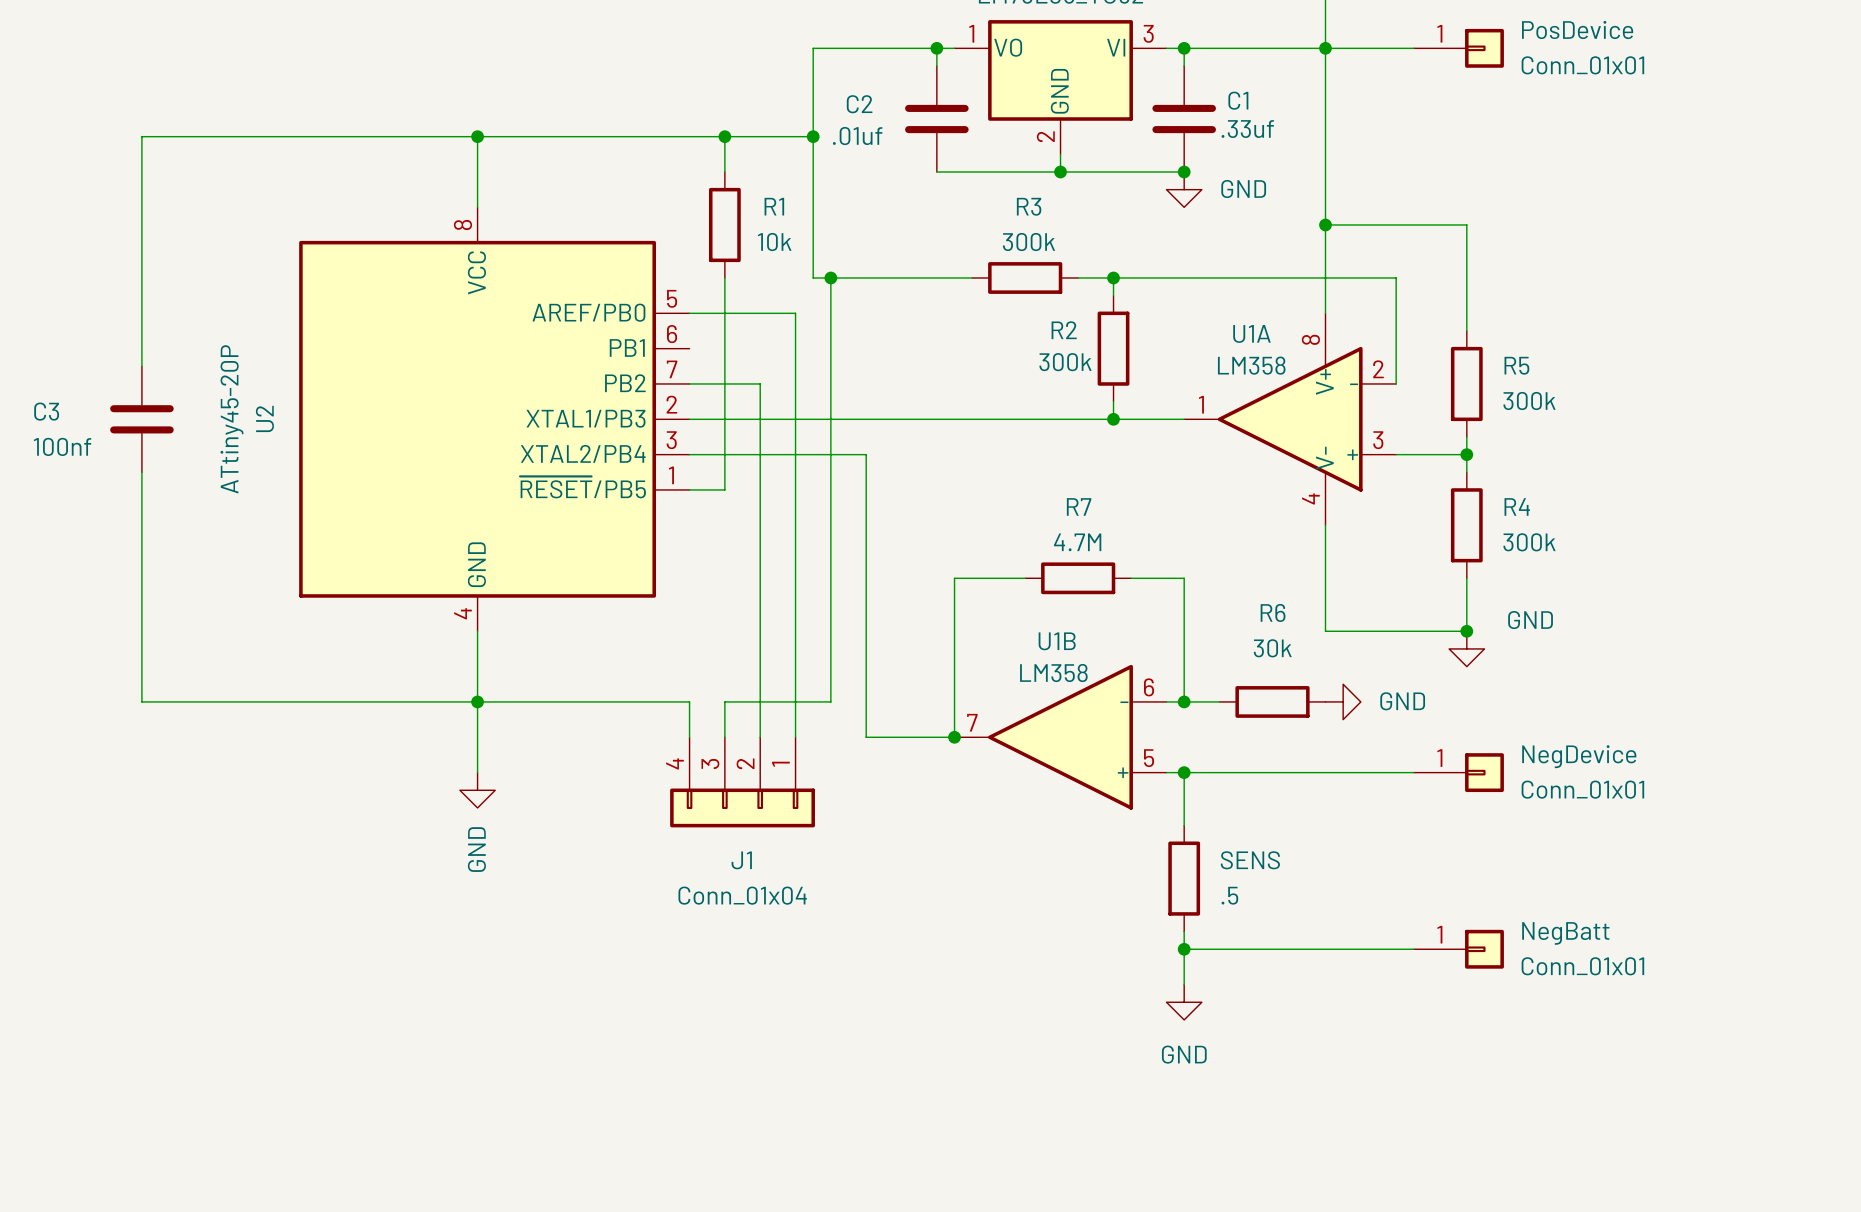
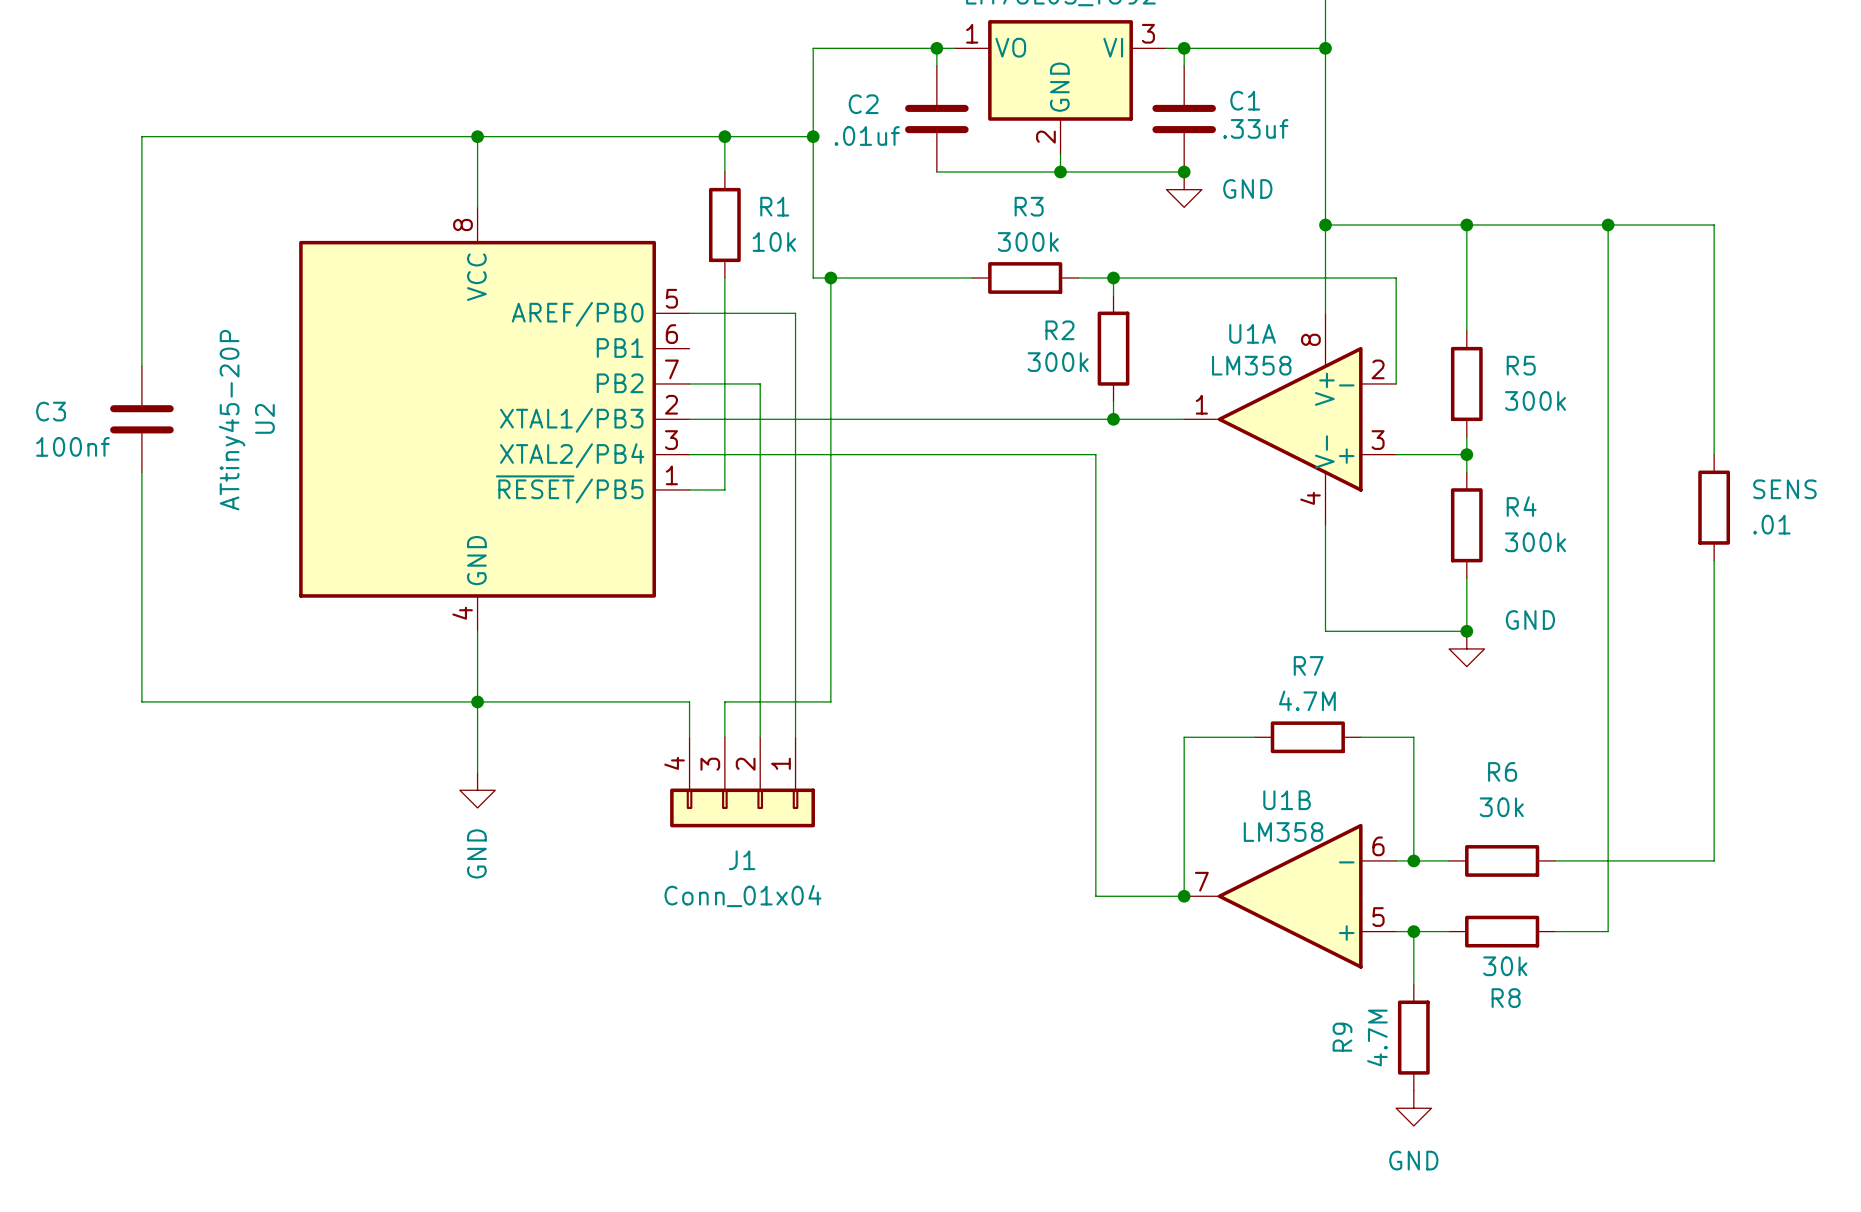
wire: (1325, 48) (1413, 48) -> none
PosDevice: Conn_01x01 (1458, 48) -> none
wire: none -> (1466, 224) (1714, 224) (1714, 454)
junction: none -> (1466, 224)
wire: none -> (1608, 224) (1608, 931) (1555, 931)
junction: none -> (1608, 224)
wire: (866, 454) (866, 737) (954, 737) (954, 578) (1025, 578) -> (866, 454) (1095, 454) (1095, 896) (1184, 896) (1184, 825)
SENS: none -> .01 (1714, 507)
wire: none -> (1714, 560) (1714, 860) (1555, 860)
R7 position: (1078, 578) -> (1307, 737)
wire: (1131, 578) (1184, 578) (1184, 701) -> (1360, 737) (1413, 737) (1413, 860)
wire: (1166, 701) (1219, 701) -> (1396, 860) (1449, 860)
junction: (1184, 701) -> none
R6 position: (1272, 701) -> (1502, 860)
power symbol: GND (1343, 701) -> none
junction: (954, 737) -> none
U1B position: (1060, 737) -> (1290, 896)
wire: none -> (1254, 737) (1184, 737) (1184, 772)
wire: (1166, 772) (1413, 772) -> none
junction: (1184, 772) -> none
NegDevice: Conn_01x01 (1458, 772) -> none
junction: none -> (1413, 860)
SENS: .5 (1184, 878) -> none
wire: (1184, 931) (1184, 984) -> (1413, 931) (1413, 984)
wire: none -> (1396, 931) (1449, 931)
junction: none -> (1413, 931)
R8: none -> 30k (1502, 931)
wire: (1184, 949) (1413, 949) -> none
junction position: (1184, 949) -> (1184, 896)
NegBatt: Conn_01x01 (1458, 949) -> none
power symbol: GND (1184, 1002) -> none
R9: none -> 4.7M (1413, 1037)
power symbol: none -> GND (1413, 1108)

